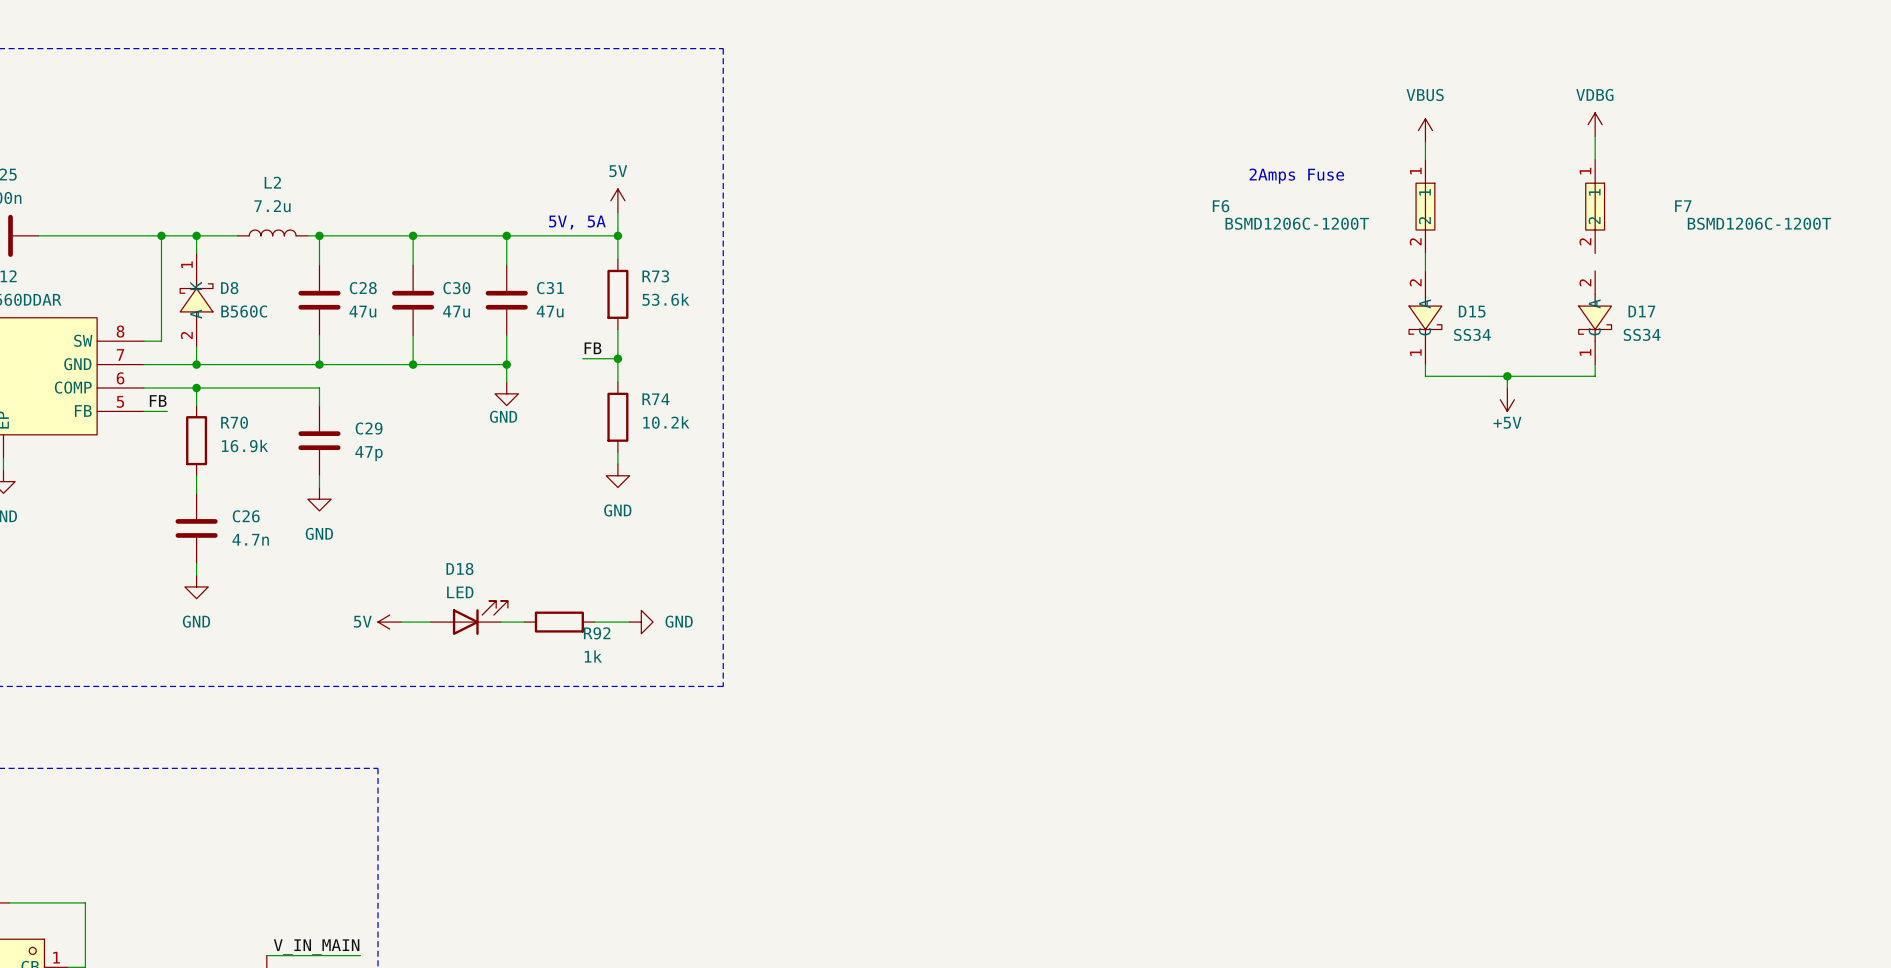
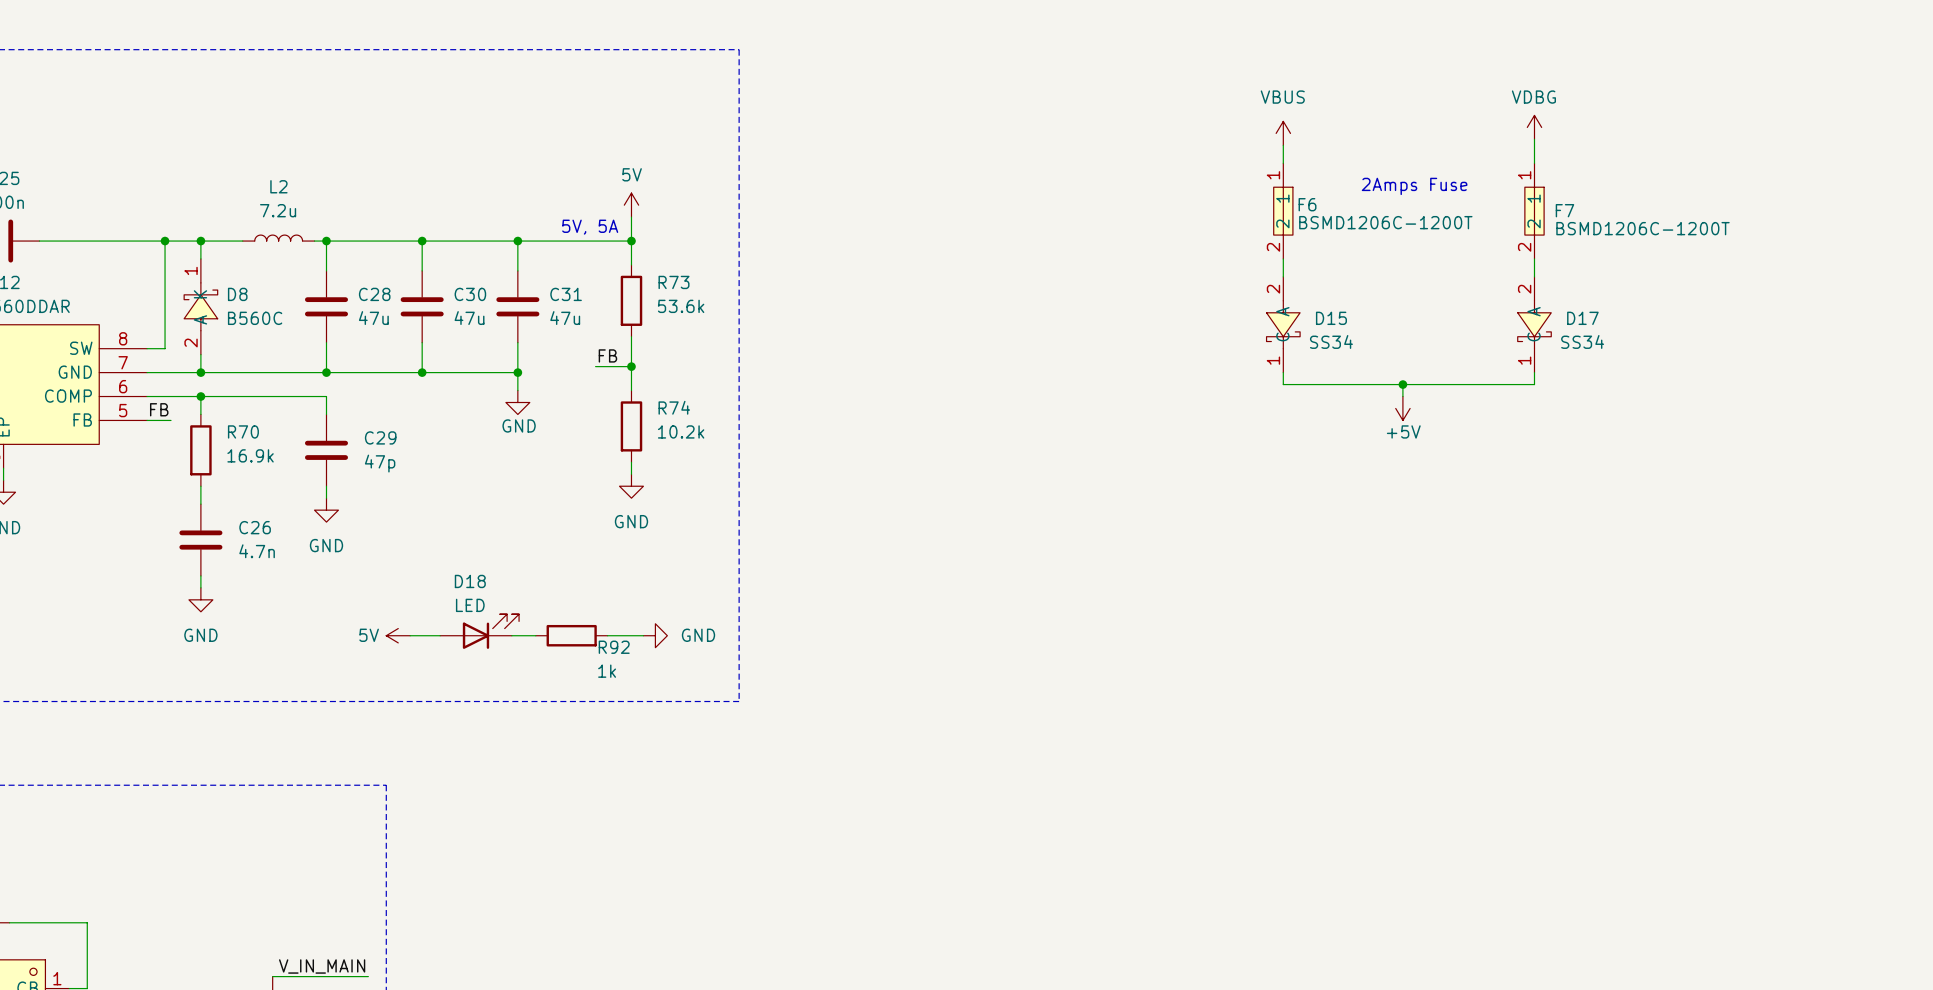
power symbol position: VDBG (1595, 124) -> VDBG (1534, 127)
power symbol position: VBUS (1425, 130) -> VBUS (1283, 133)
wire: (1595, 136) (1595, 159) -> (1534, 139) (1534, 163)
wire: (1425, 142) (1425, 159) -> (1283, 145) (1283, 163)
text position: 2Amps Fuse (1296, 176) -> 2Amps Fuse (1414, 186)
F6 name position: F6 (1221, 206) -> F6 (1307, 204)
F6 position: (1425, 206) -> (1283, 211)
F7 position: (1595, 206) -> (1534, 211)
F7 name position: F7 (1683, 206) -> F7 (1564, 210)
F6 value position: BSMD1206C-1200T (1297, 223) -> BSMD1206C-1200T (1385, 222)
F7 value position: BSMD1206C-1200T (1759, 223) -> BSMD1206C-1200T (1642, 228)
wire: none -> (1283, 258) (1283, 276)
wire: (1425, 253) (1425, 270) -> (1534, 258) (1534, 276)
D15 position: (1425, 317) -> (1283, 324)
D17 position: (1595, 317) -> (1534, 324)
wire: (1425, 364) (1425, 376) -> (1283, 372) (1283, 384) (1456, 384)
wire: (1595, 364) (1595, 376) (1501, 376) -> (1534, 372) (1534, 384)
junction: none -> (1402, 384)
wire: (1507, 376) (1507, 388) -> (1402, 384) (1402, 396)
junction: (1507, 376) -> none
power symbol position: +5V (1507, 399) -> +5V (1402, 408)

